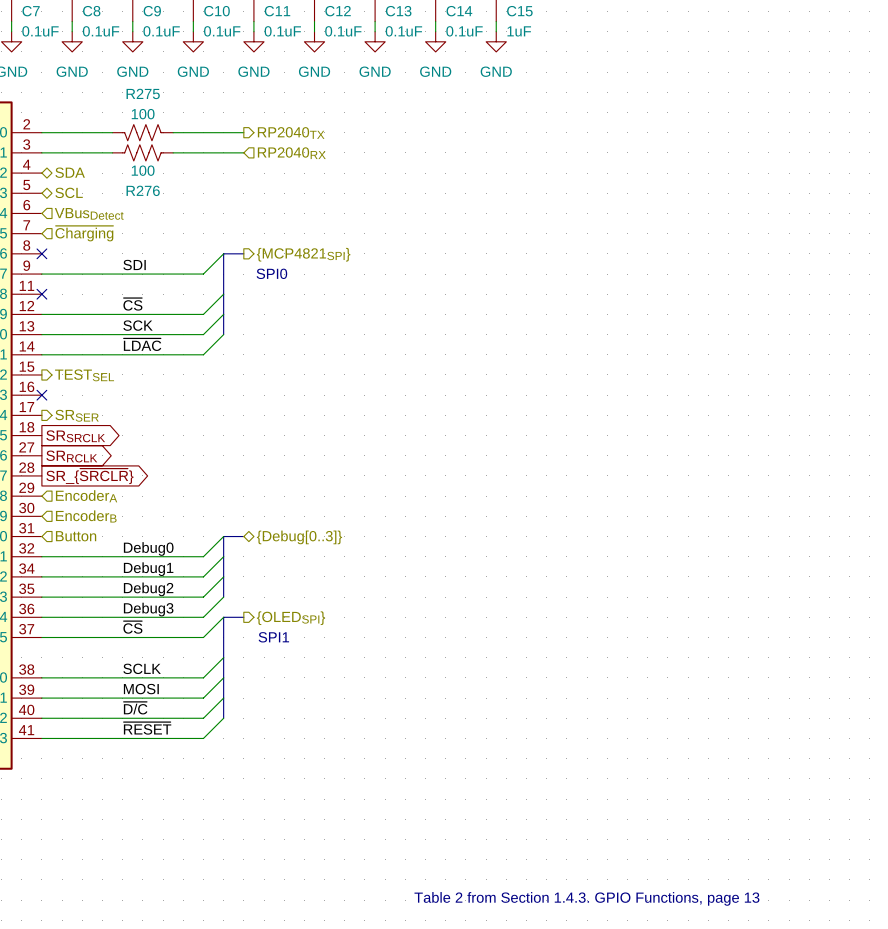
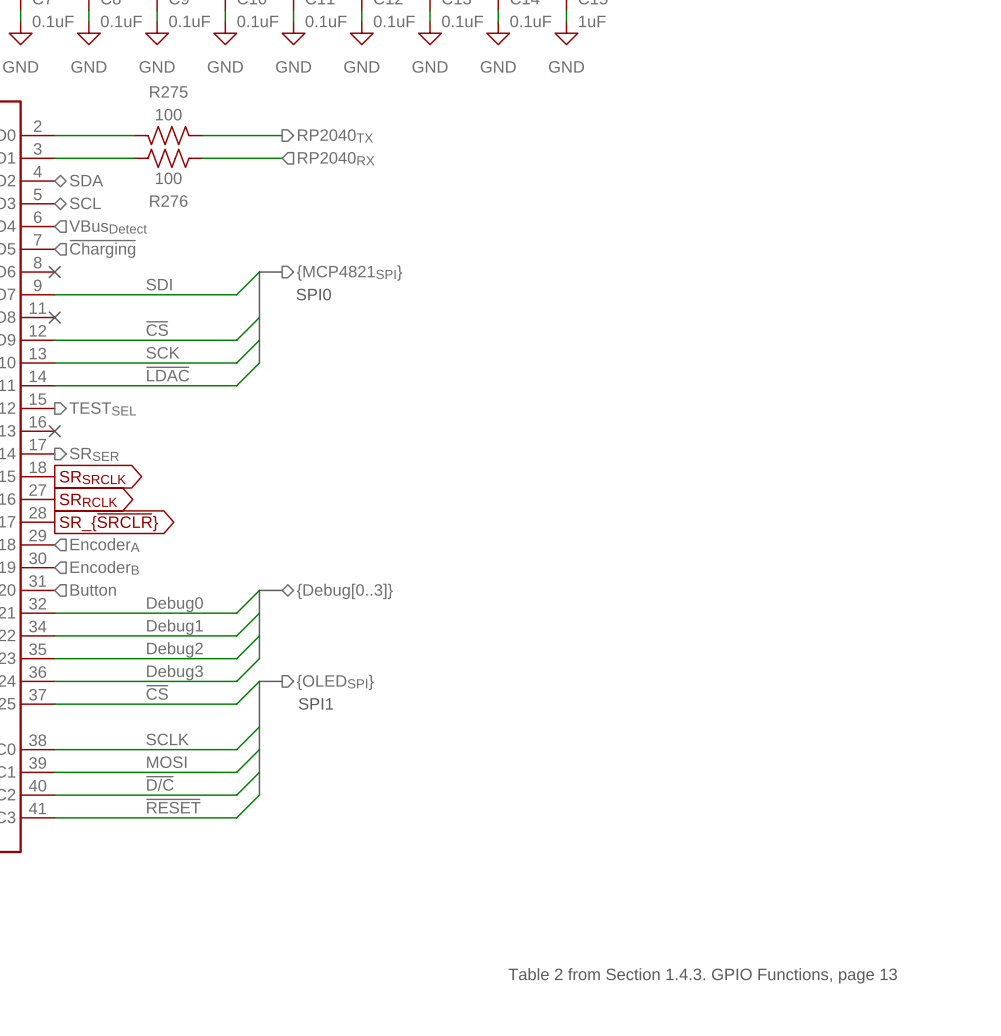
text position: Table 2 from Section 1.4.3. GPIO Functions, page 13 (586, 898) -> Table 2 from Section 1.4.3. GPIO Functions, page 13 (702, 975)

